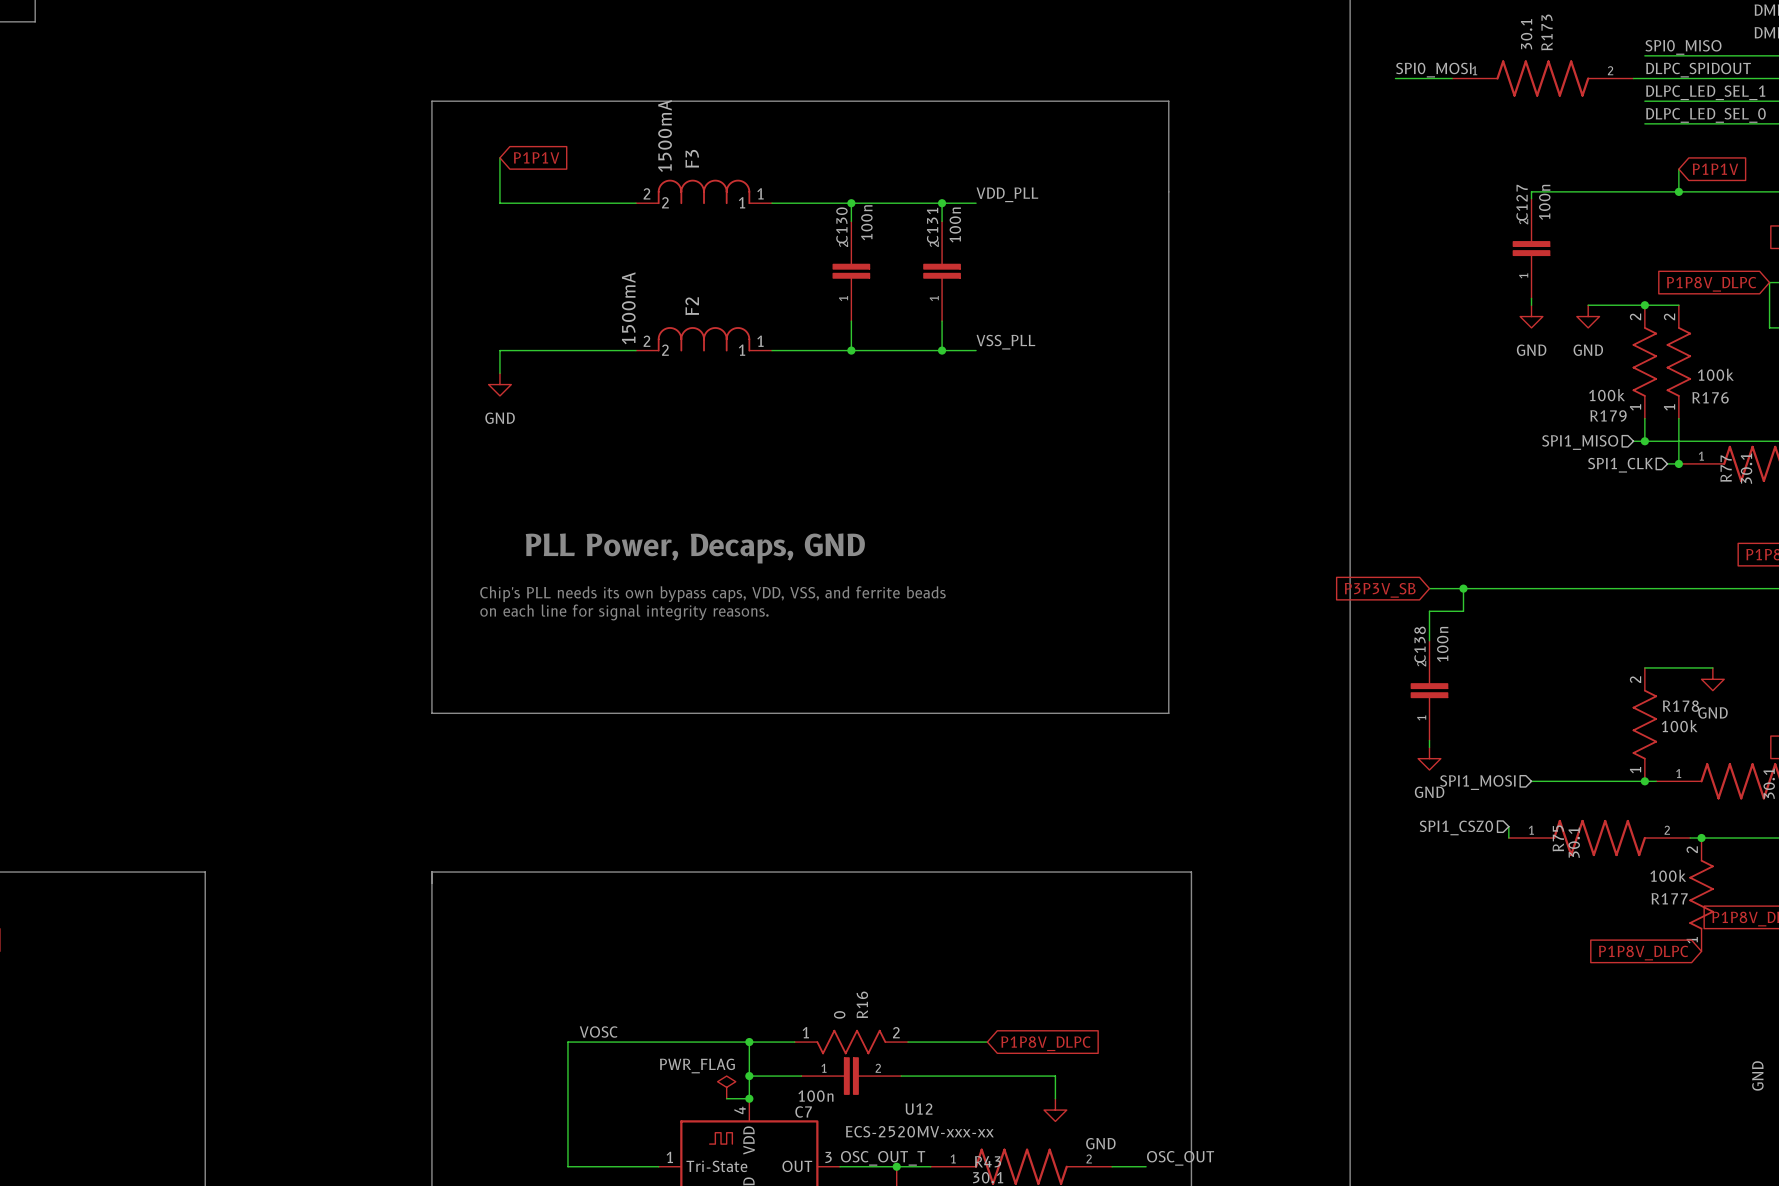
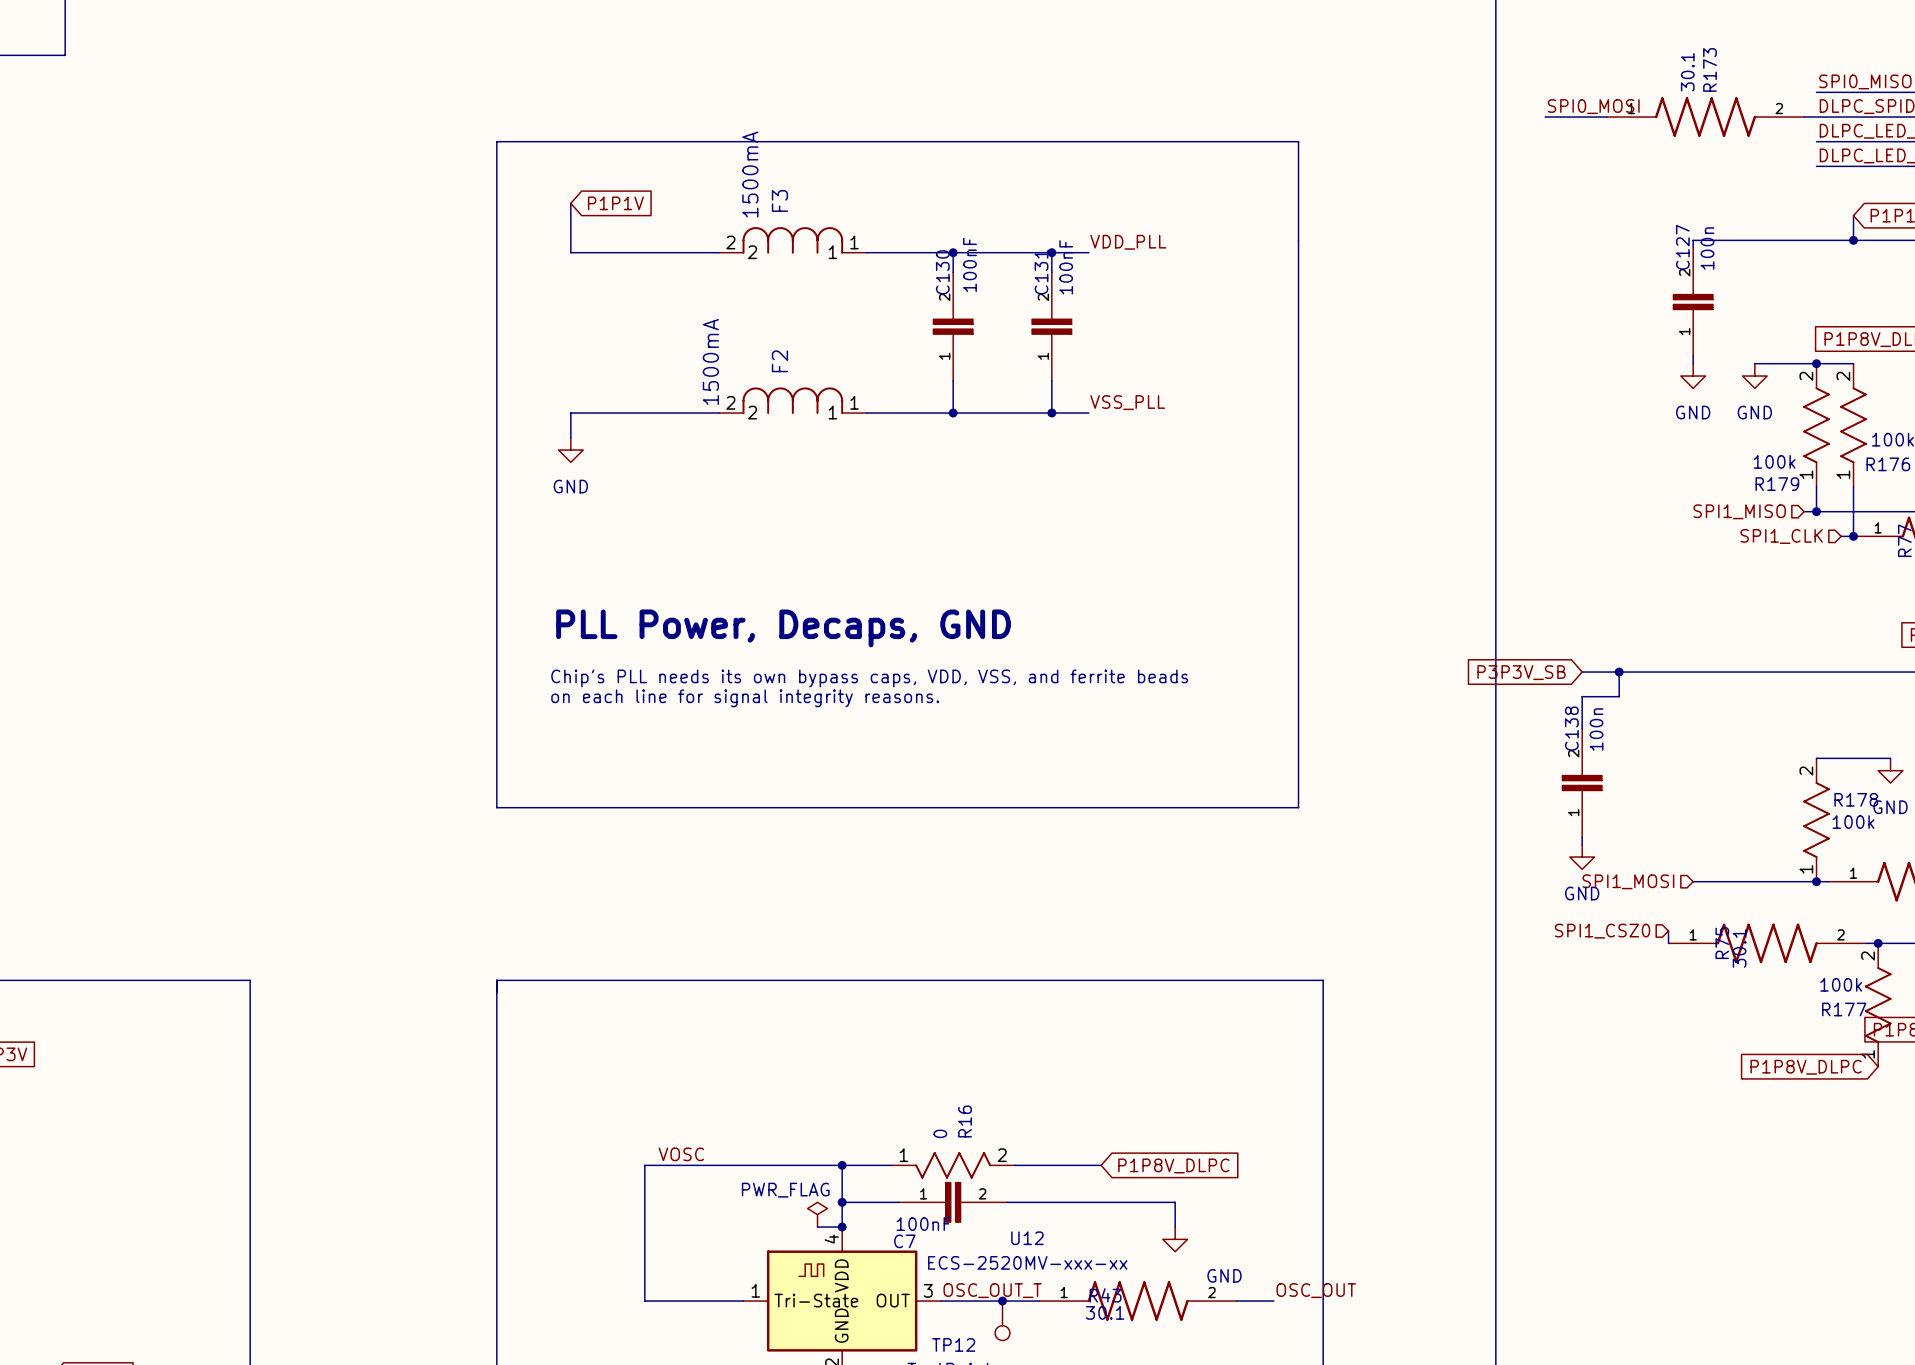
C130 value: 100n (866, 222) -> 100nF (969, 264)
C131 value: 100n (955, 225) -> 100nF (1066, 267)
C7 value: 100n (815, 1096) -> 100nF (923, 1224)

